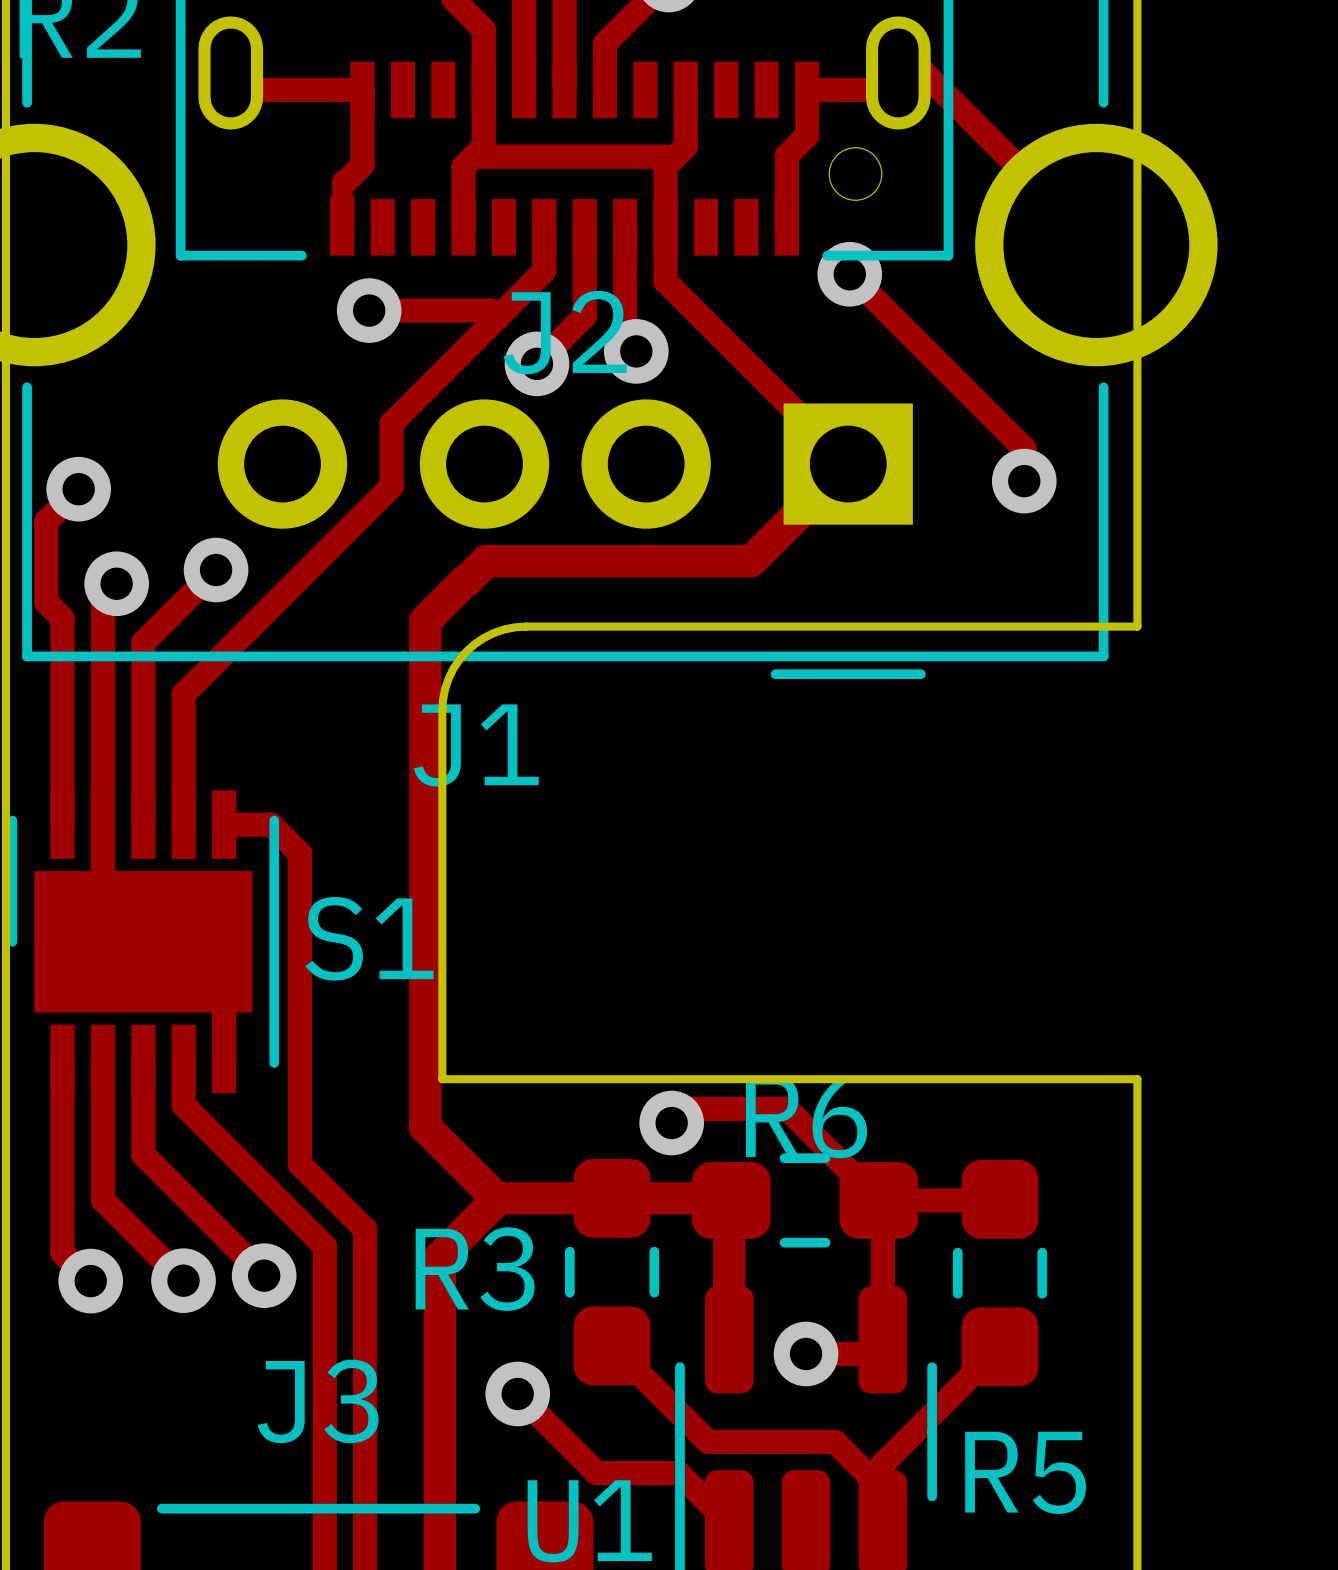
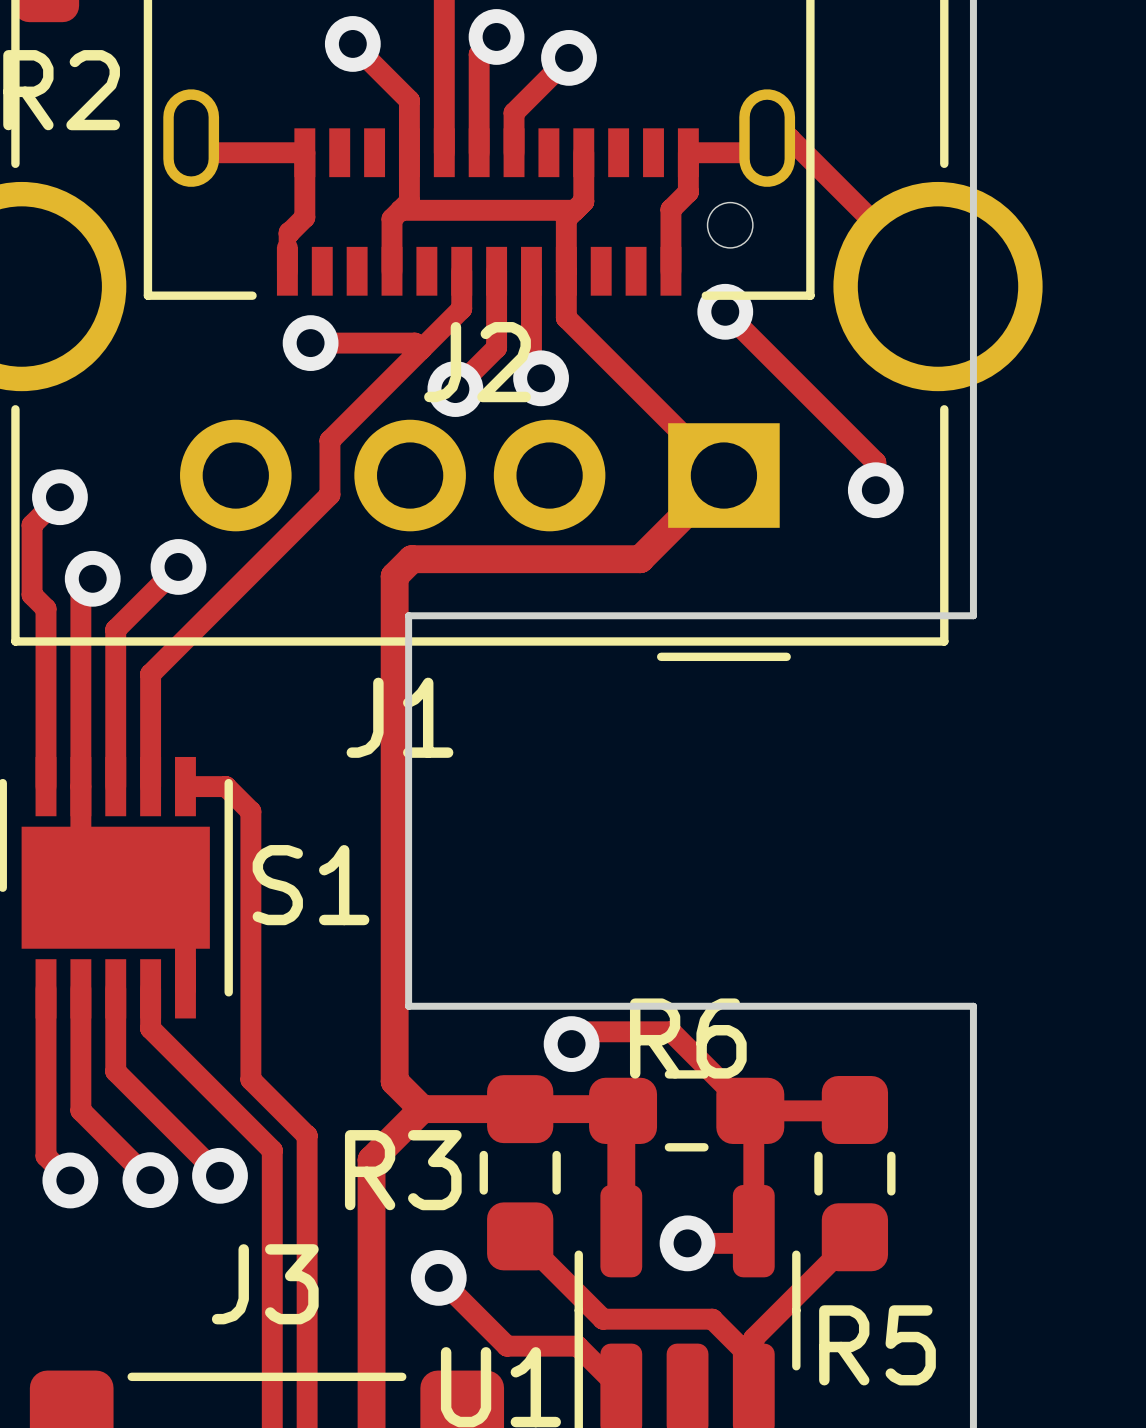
track: (465, 580) (425, 620) (425, 1127) (498, 1198) -> (394, 576) (394, 1081) (422, 1109)
board edge: (525, 626) (504, 629) (475, 643) (453, 668) (443, 699) (442, 1079) (482, 1079) -> (445, 615) (408, 615) (408, 1006)

